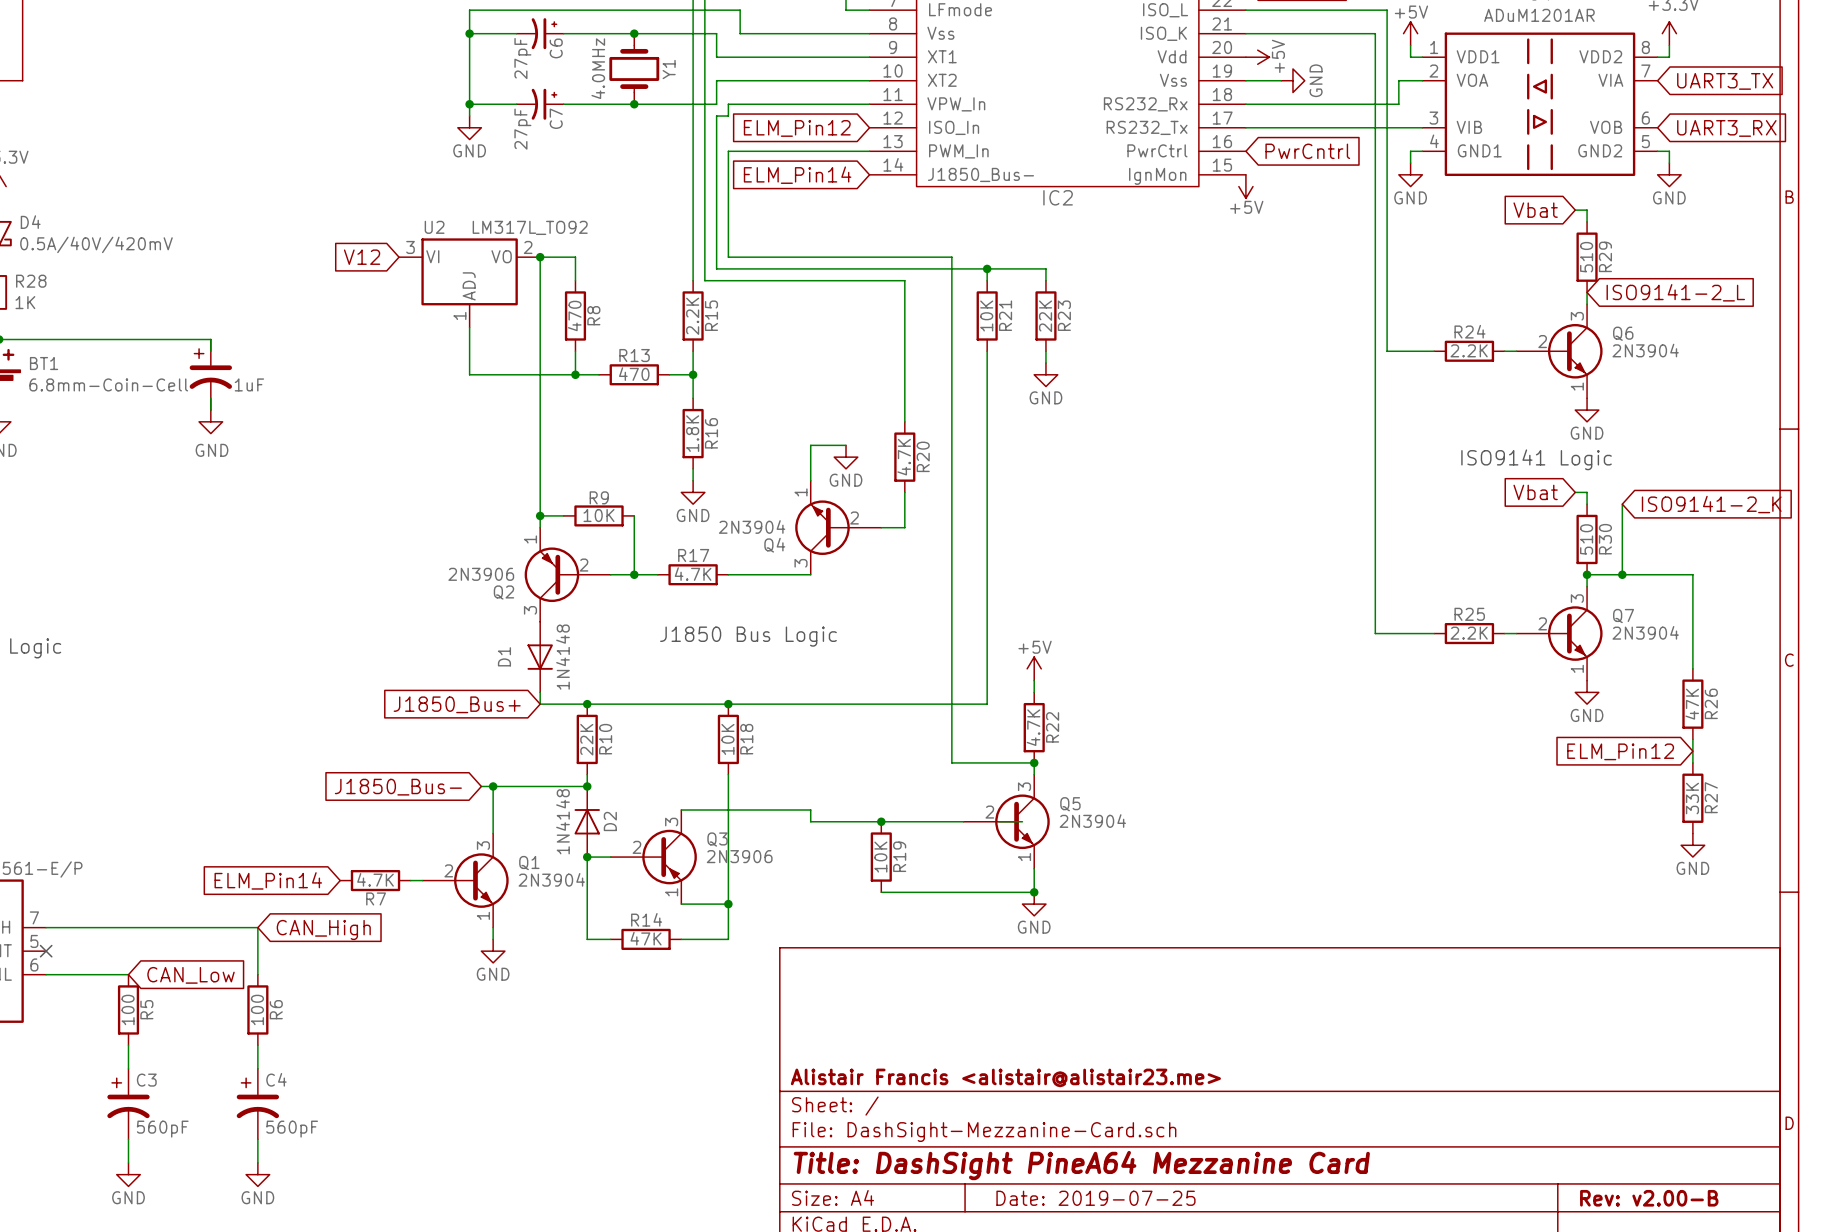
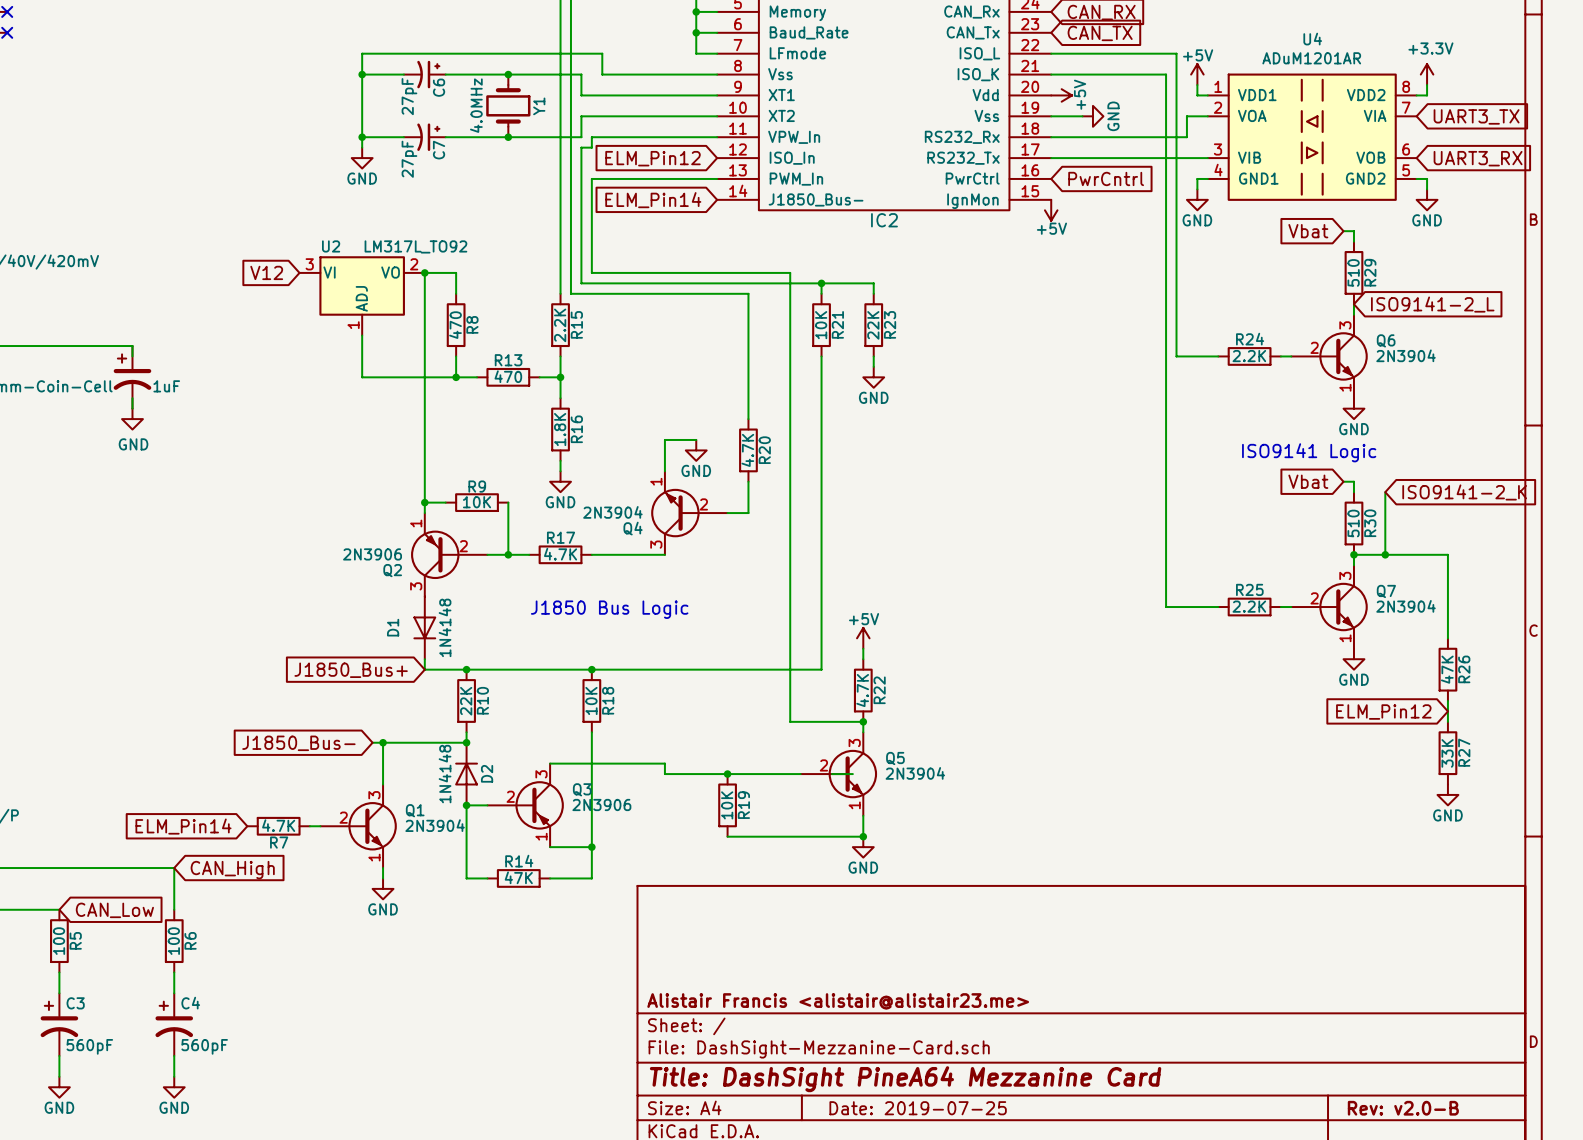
title block: Rev: v2.00-B (1649, 1198) -> Rev: v2.0-B (1403, 1108)

